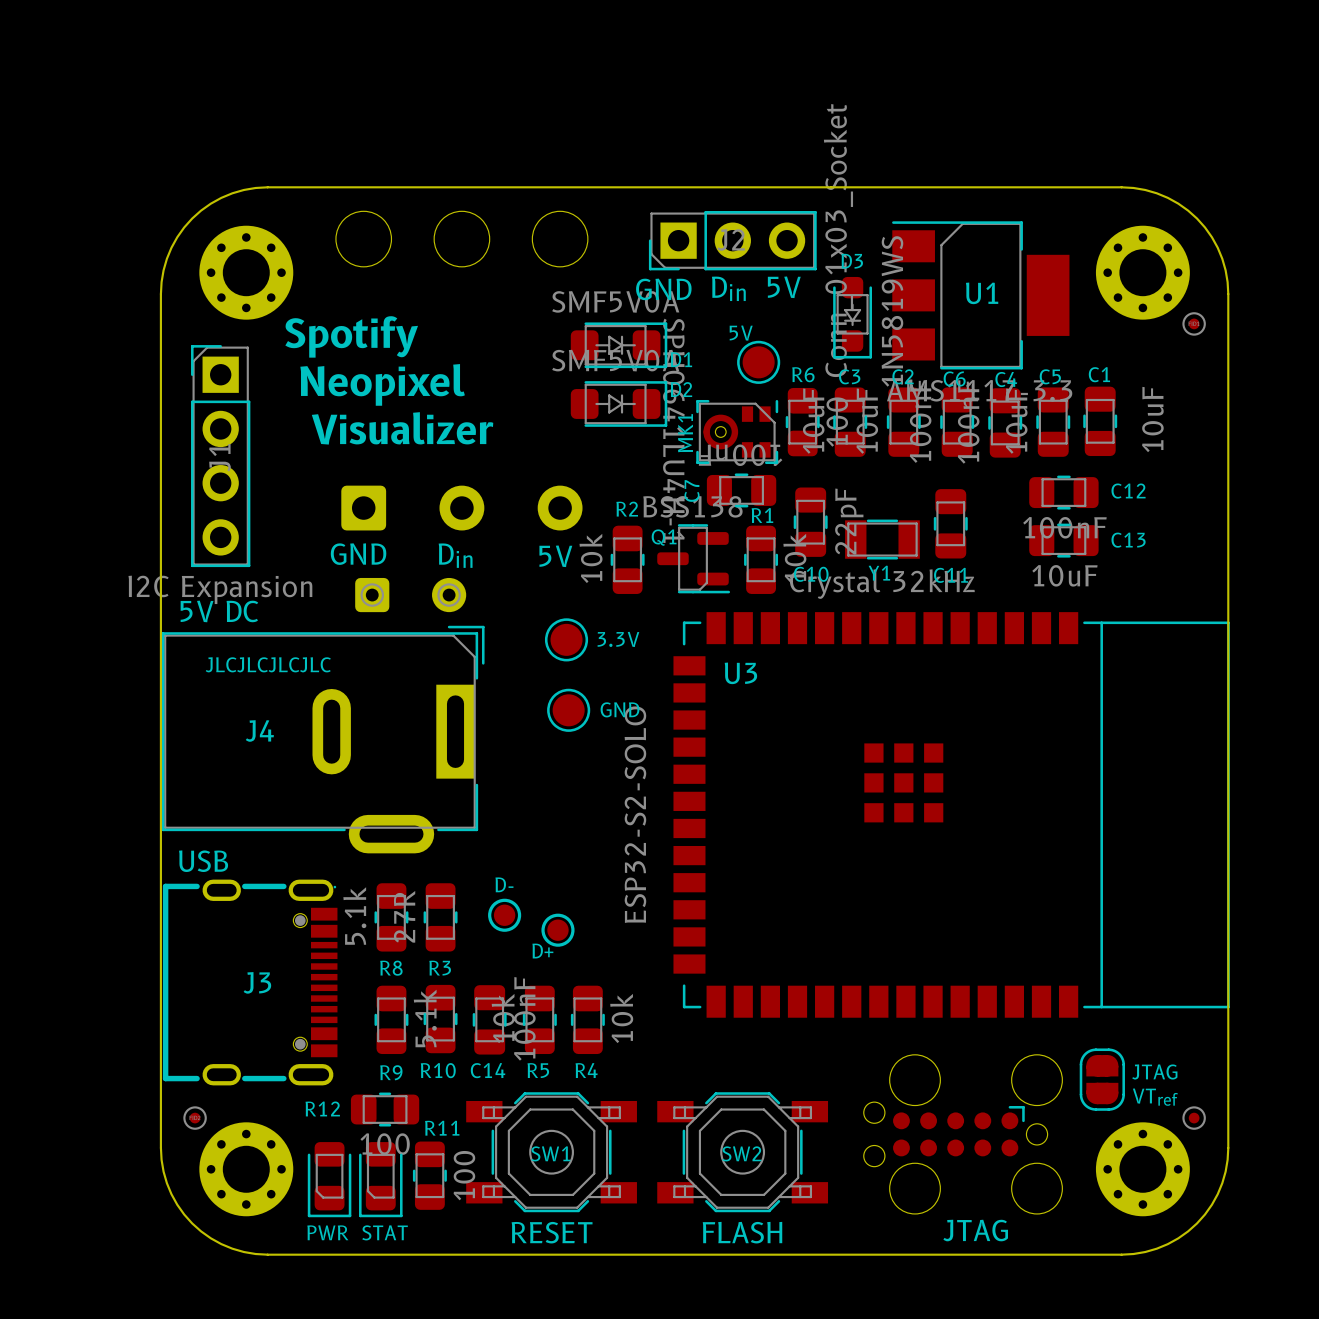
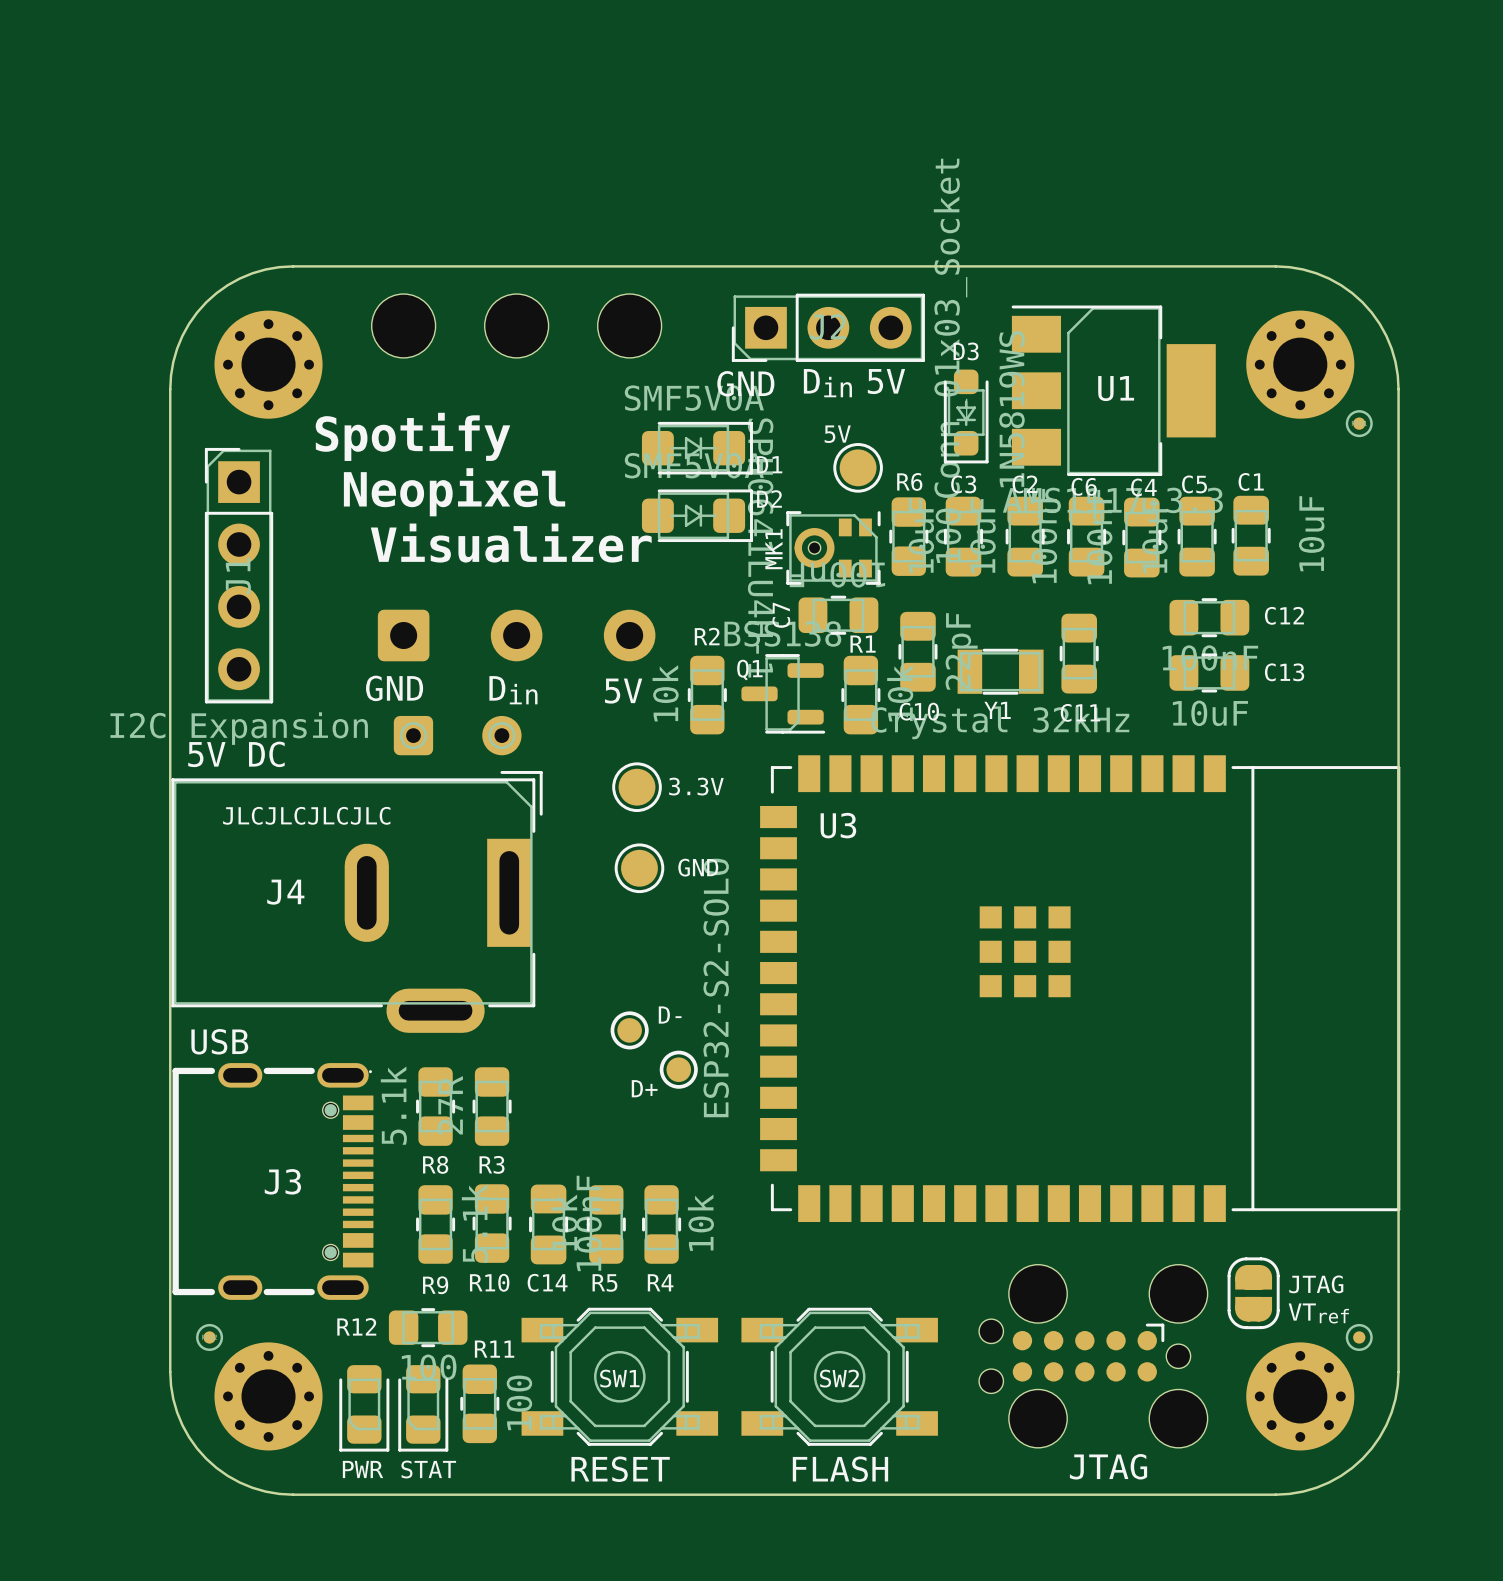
part value position: D- (504, 884) -> D- (670, 1015)
part position: (504, 915) -> (629, 1030)
part position: (557, 930) -> (678, 1069)
part value position: D+ (542, 951) -> D+ (644, 1088)

